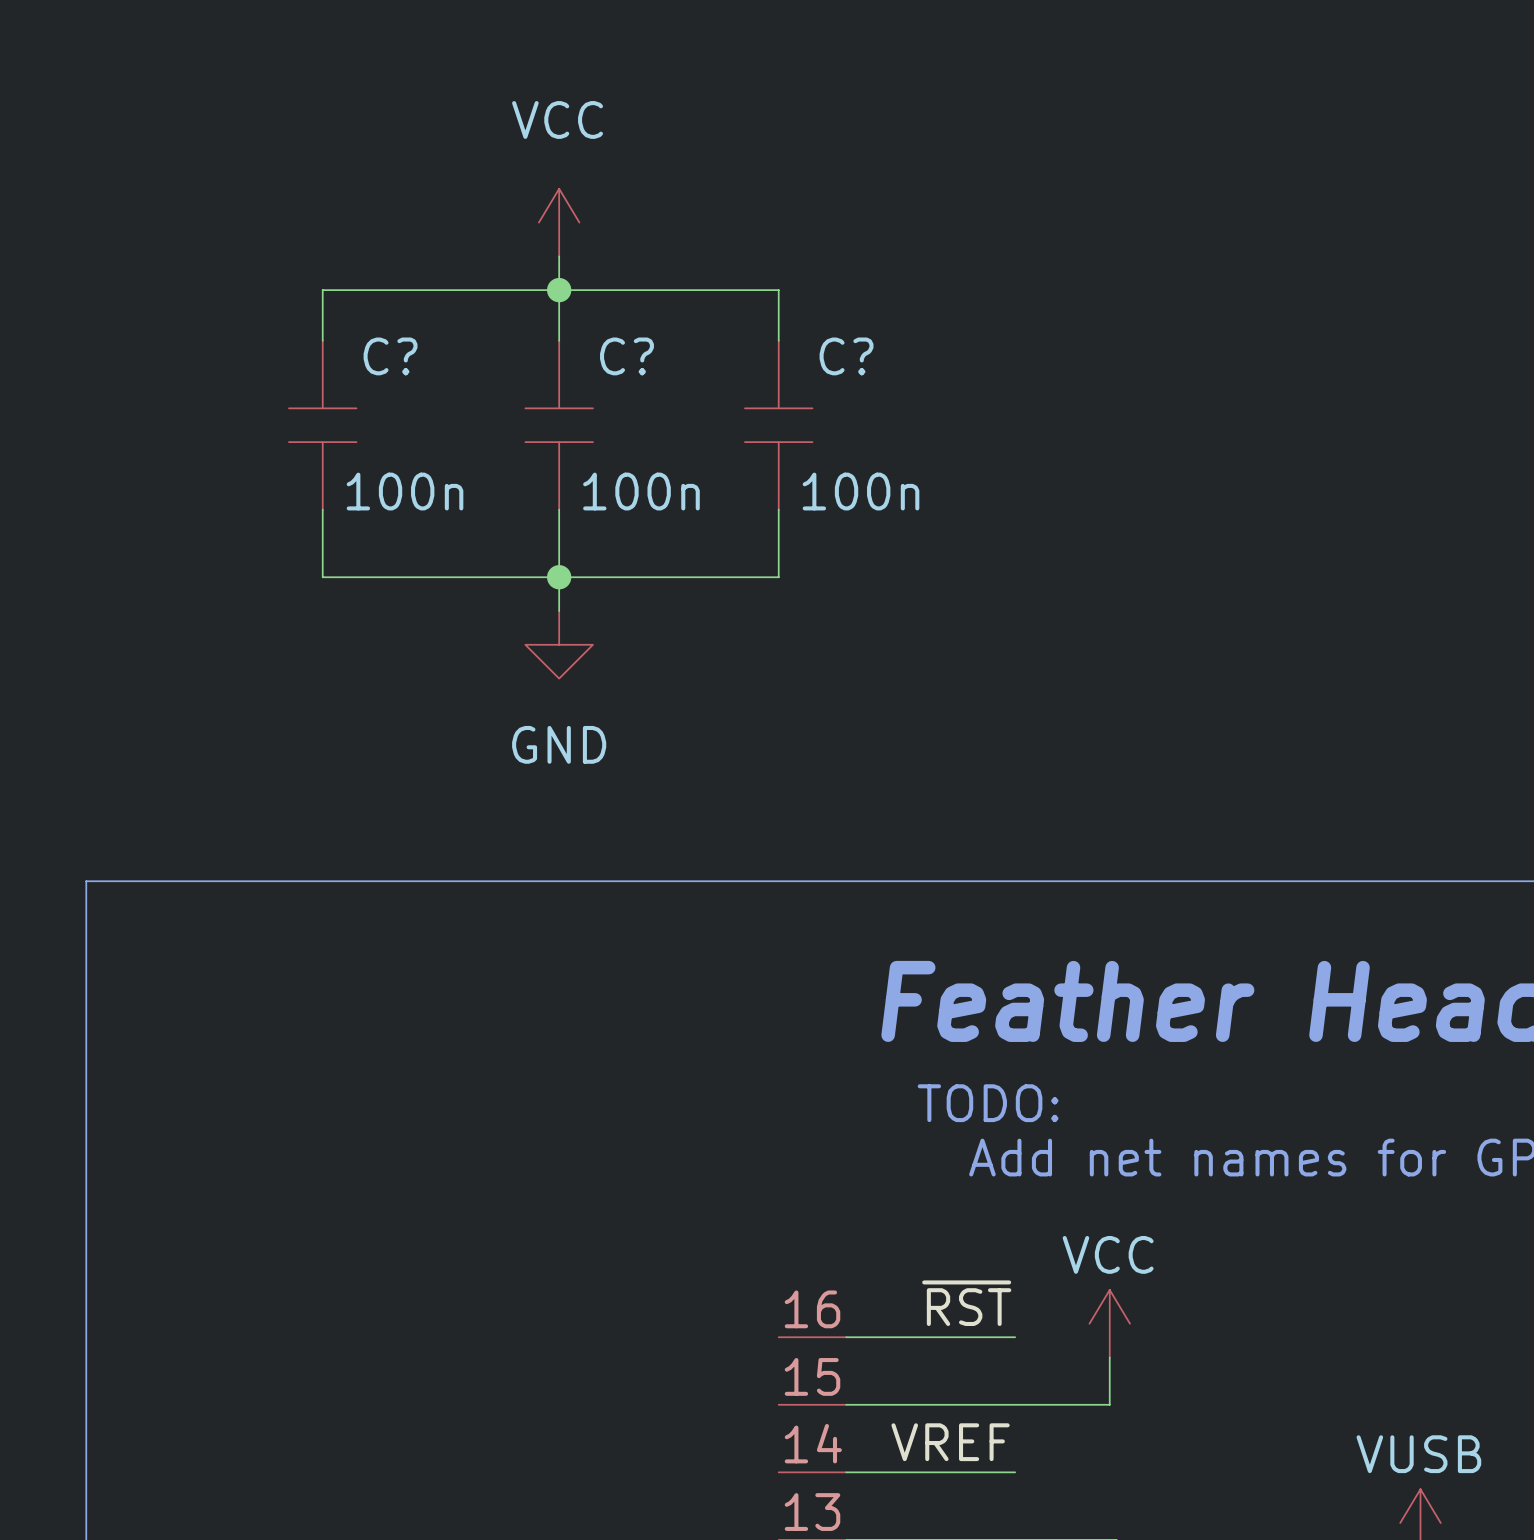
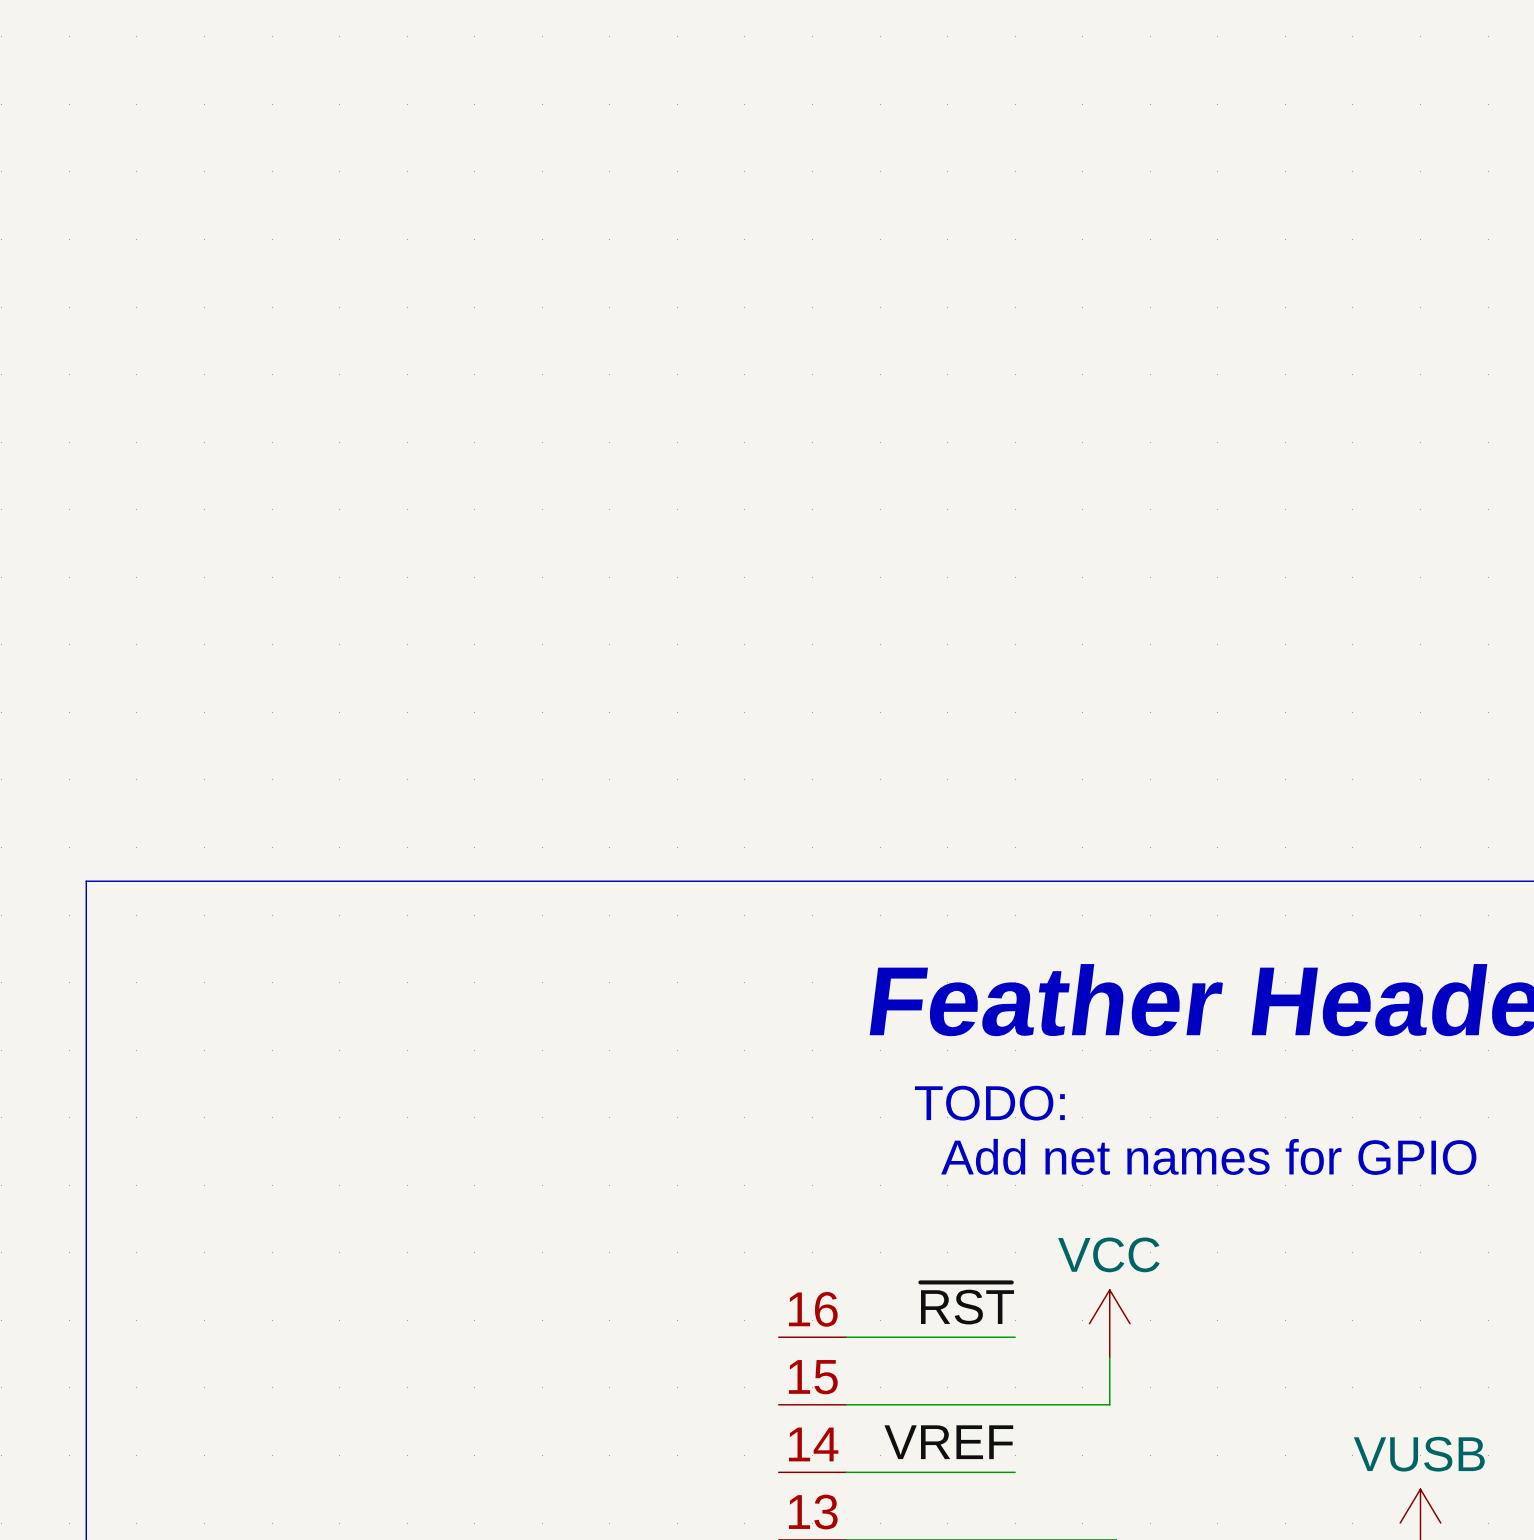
power symbol: VCC (559, 222) -> none
wire: (559, 256) (559, 340) -> none
junction: (559, 290) -> none
wire: (322, 340) (322, 290) (778, 290) (778, 340) -> none
C?: (322, 425) -> none
C?: (559, 425) -> none
C?: (778, 425) -> none
wire: (322, 509) (322, 577) (778, 577) (778, 509) -> none
wire: (559, 509) (559, 611) -> none
junction: (559, 577) -> none
power symbol: GND (559, 644) -> none

